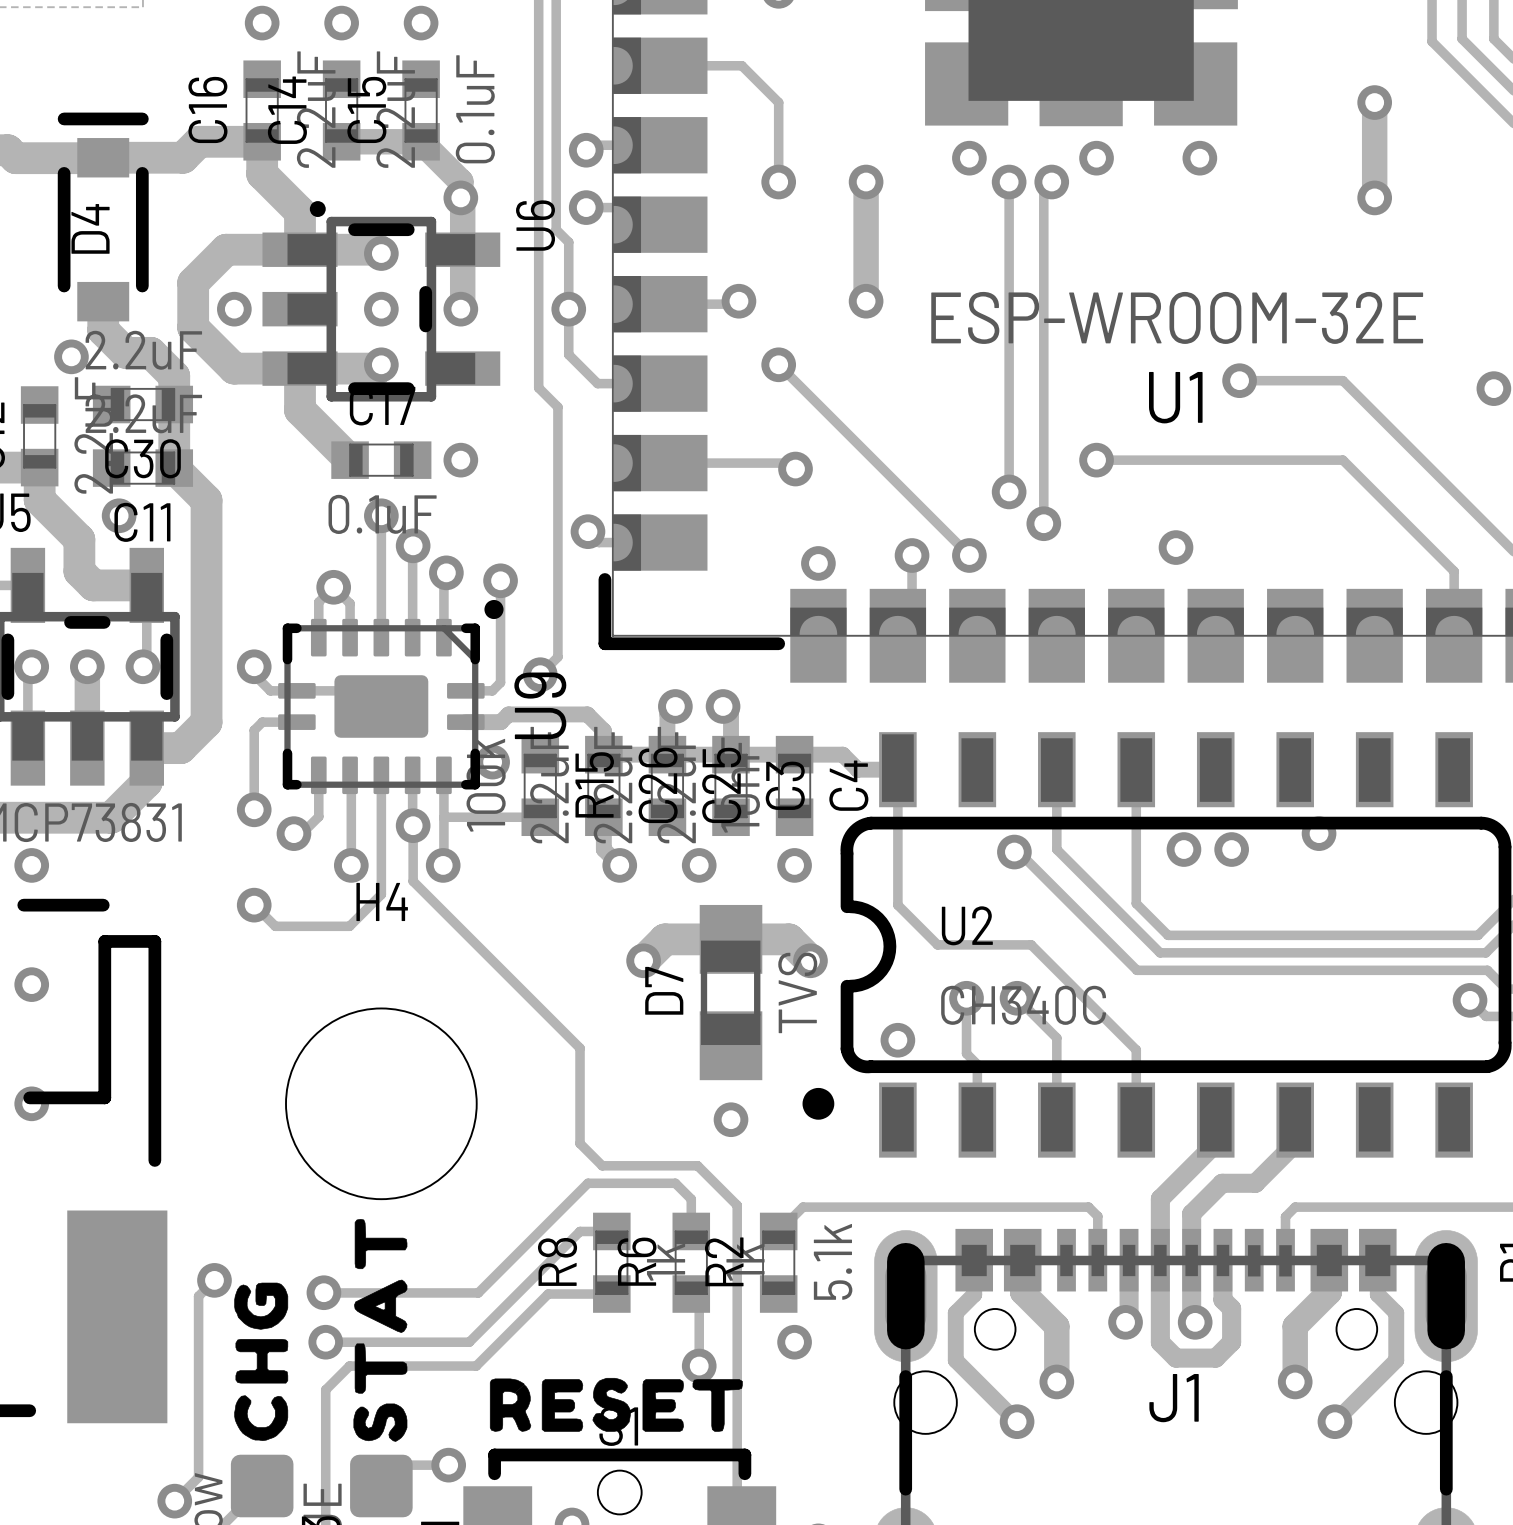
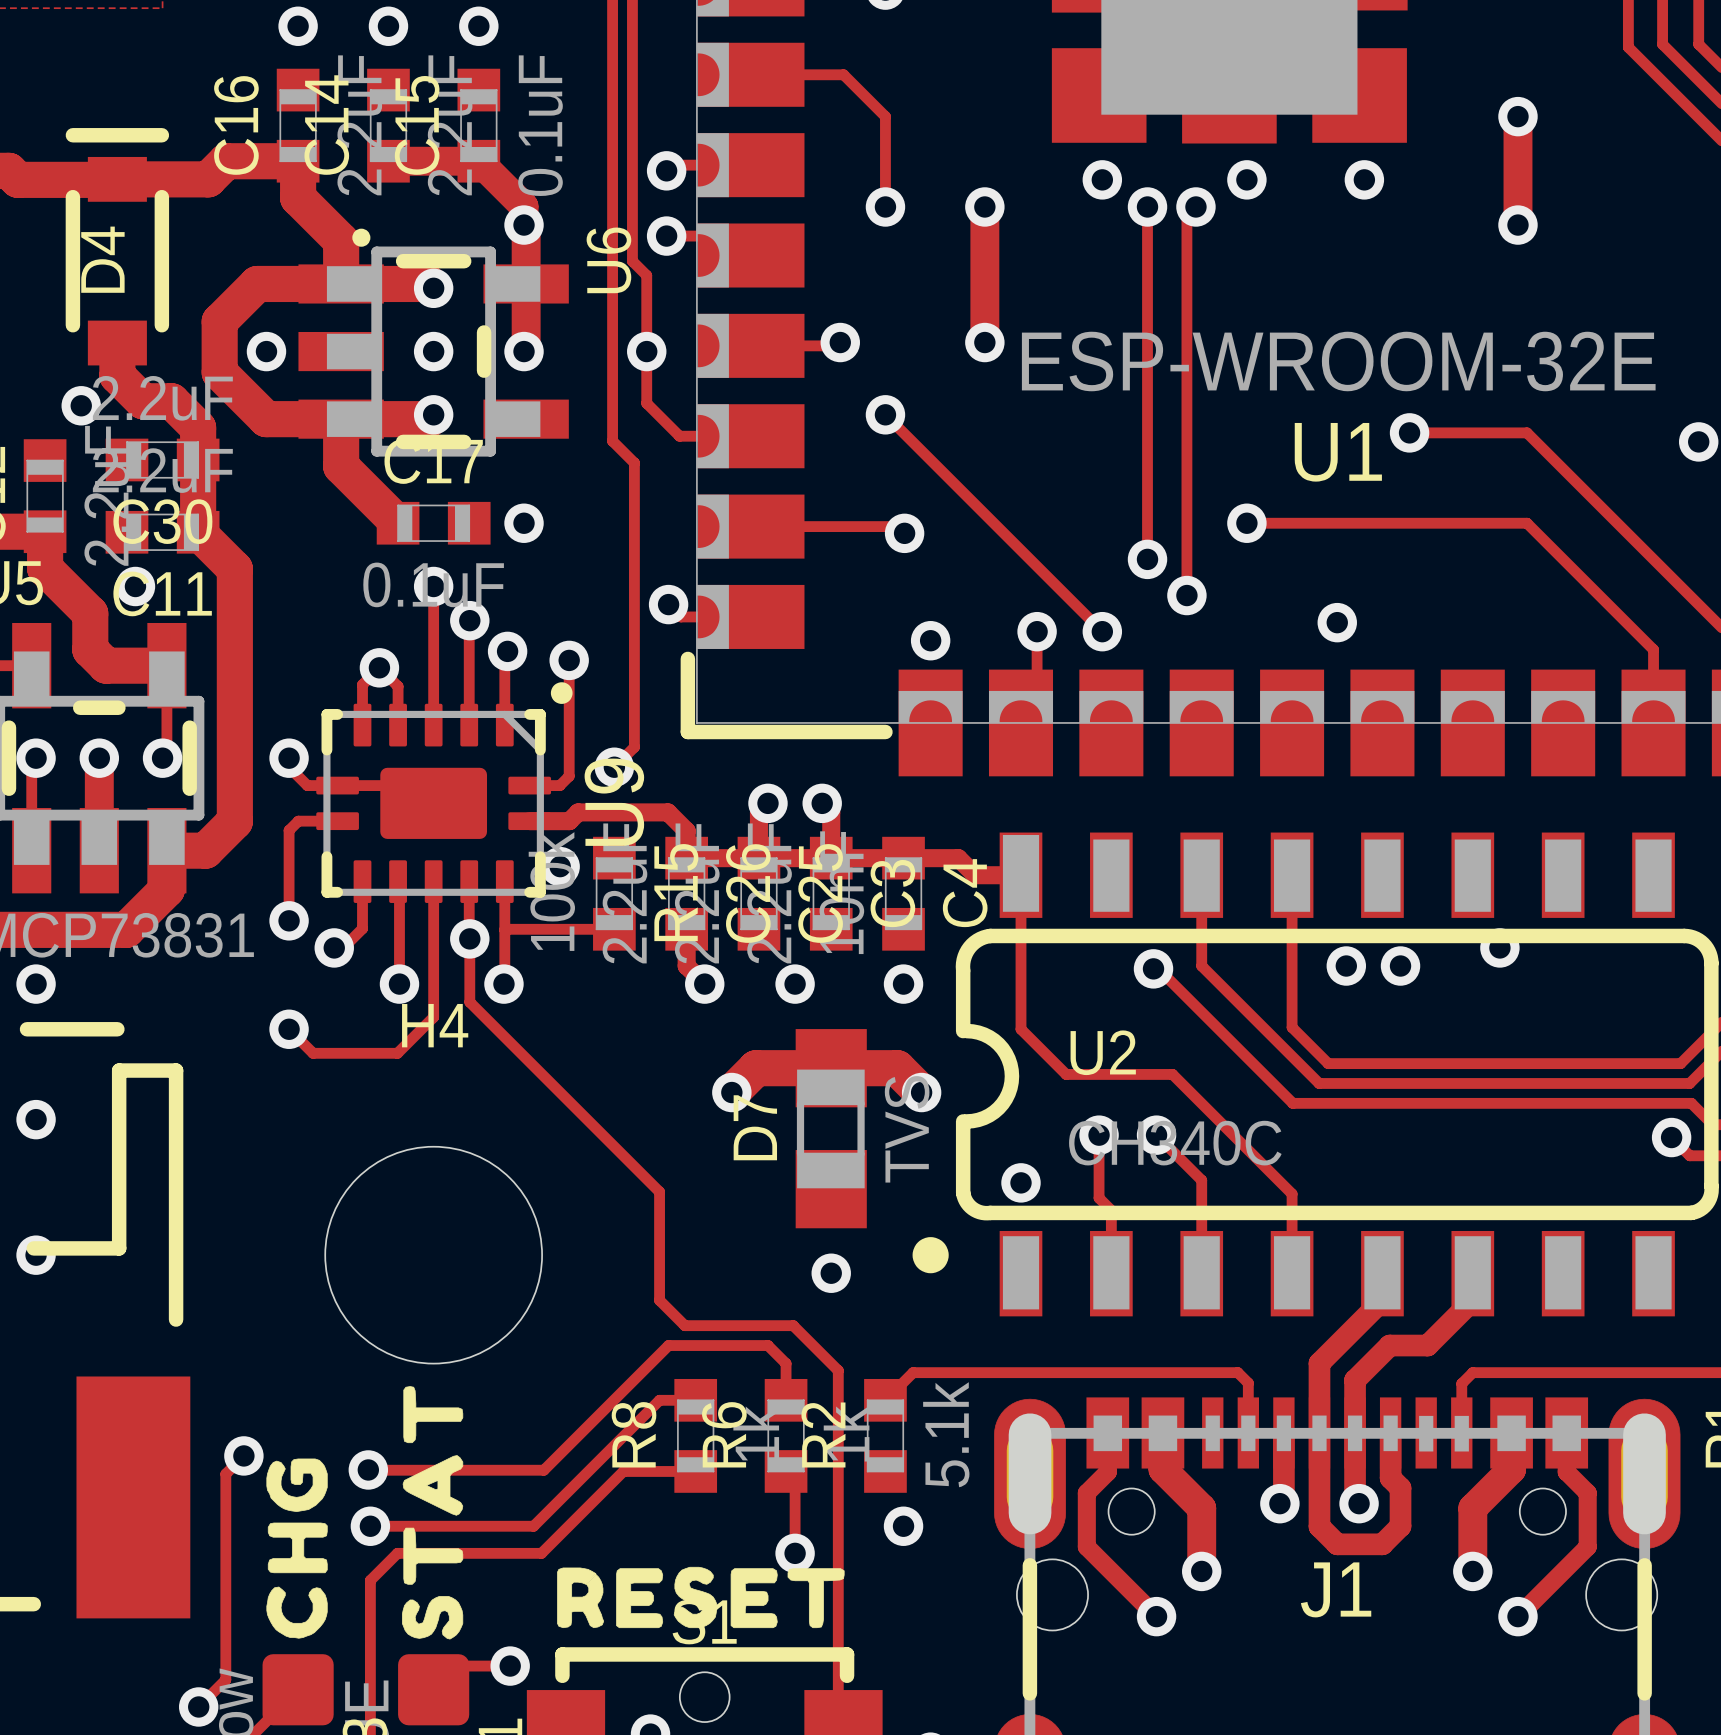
track: (1374, 102) (1374, 197) -> (1517, 116) (1517, 225)
via position: (1374, 102) -> (1517, 116)
via position: (1374, 197) -> (1517, 225)

